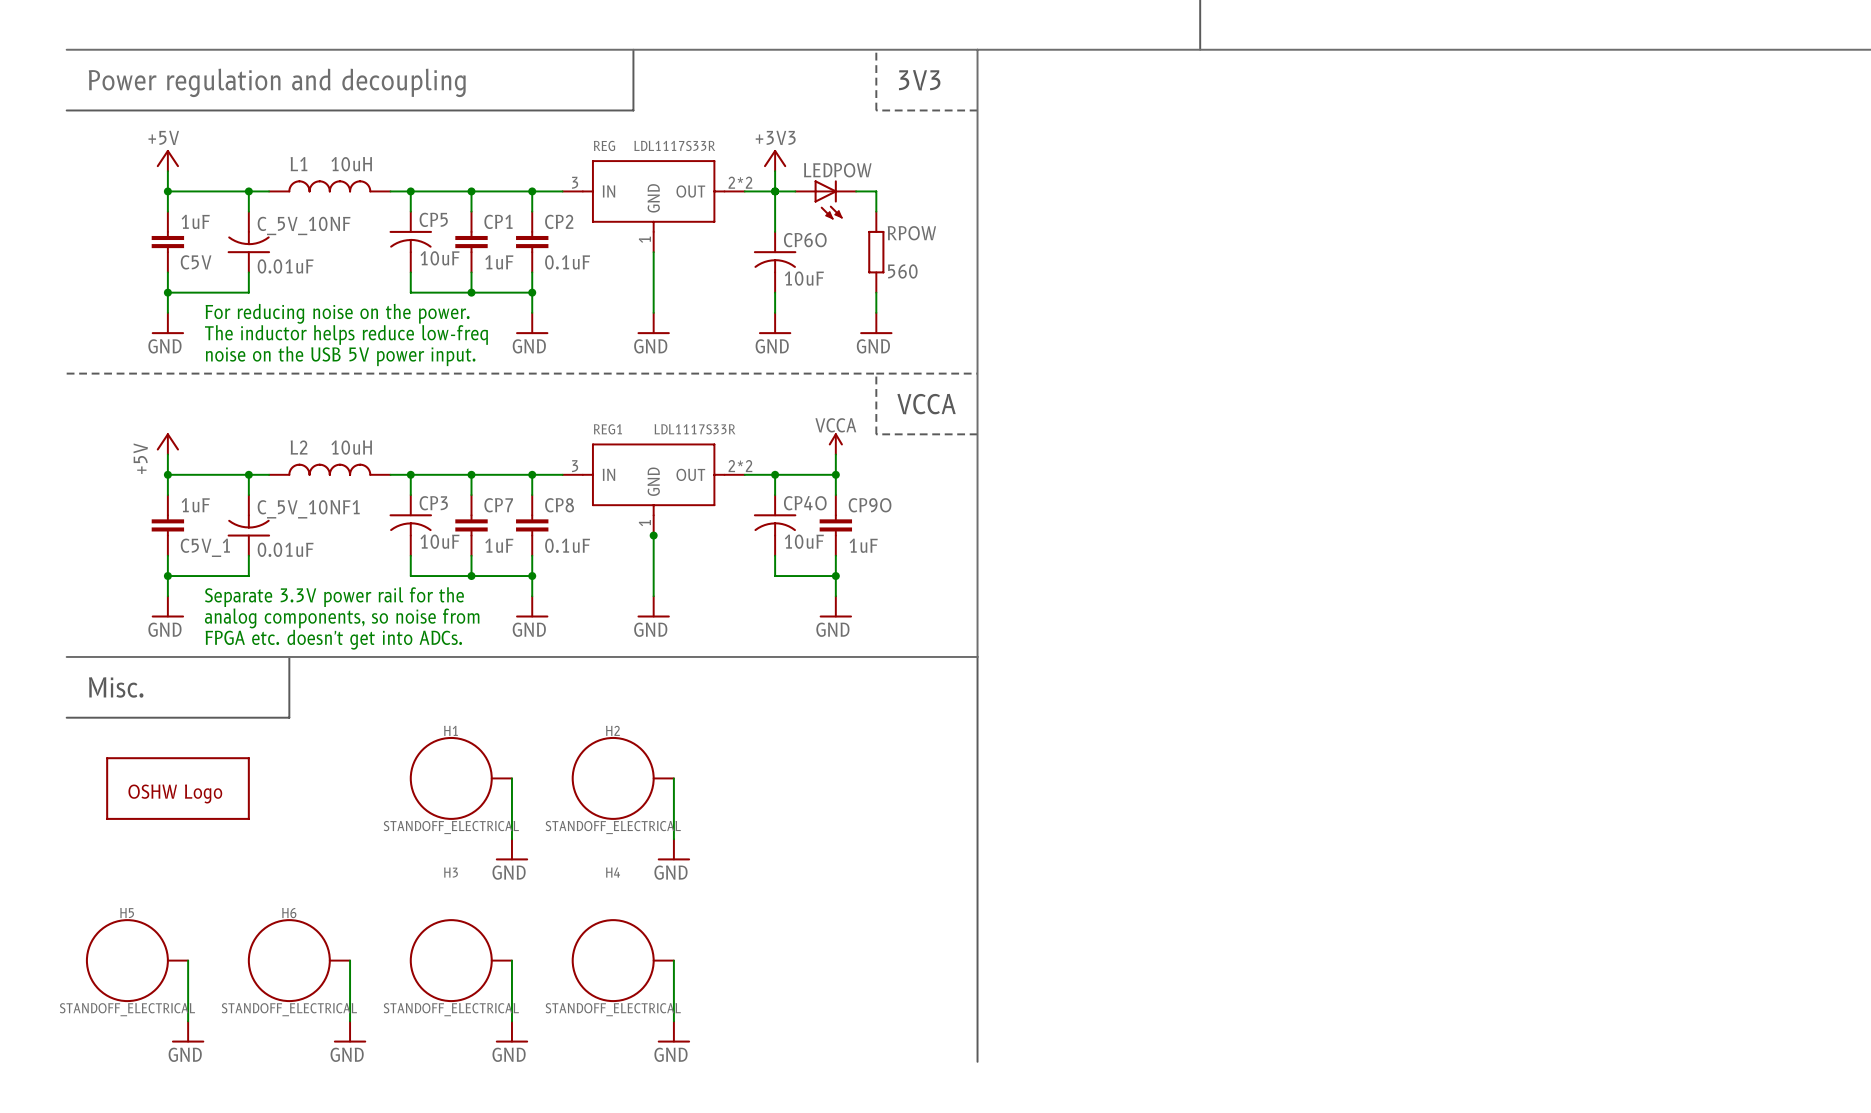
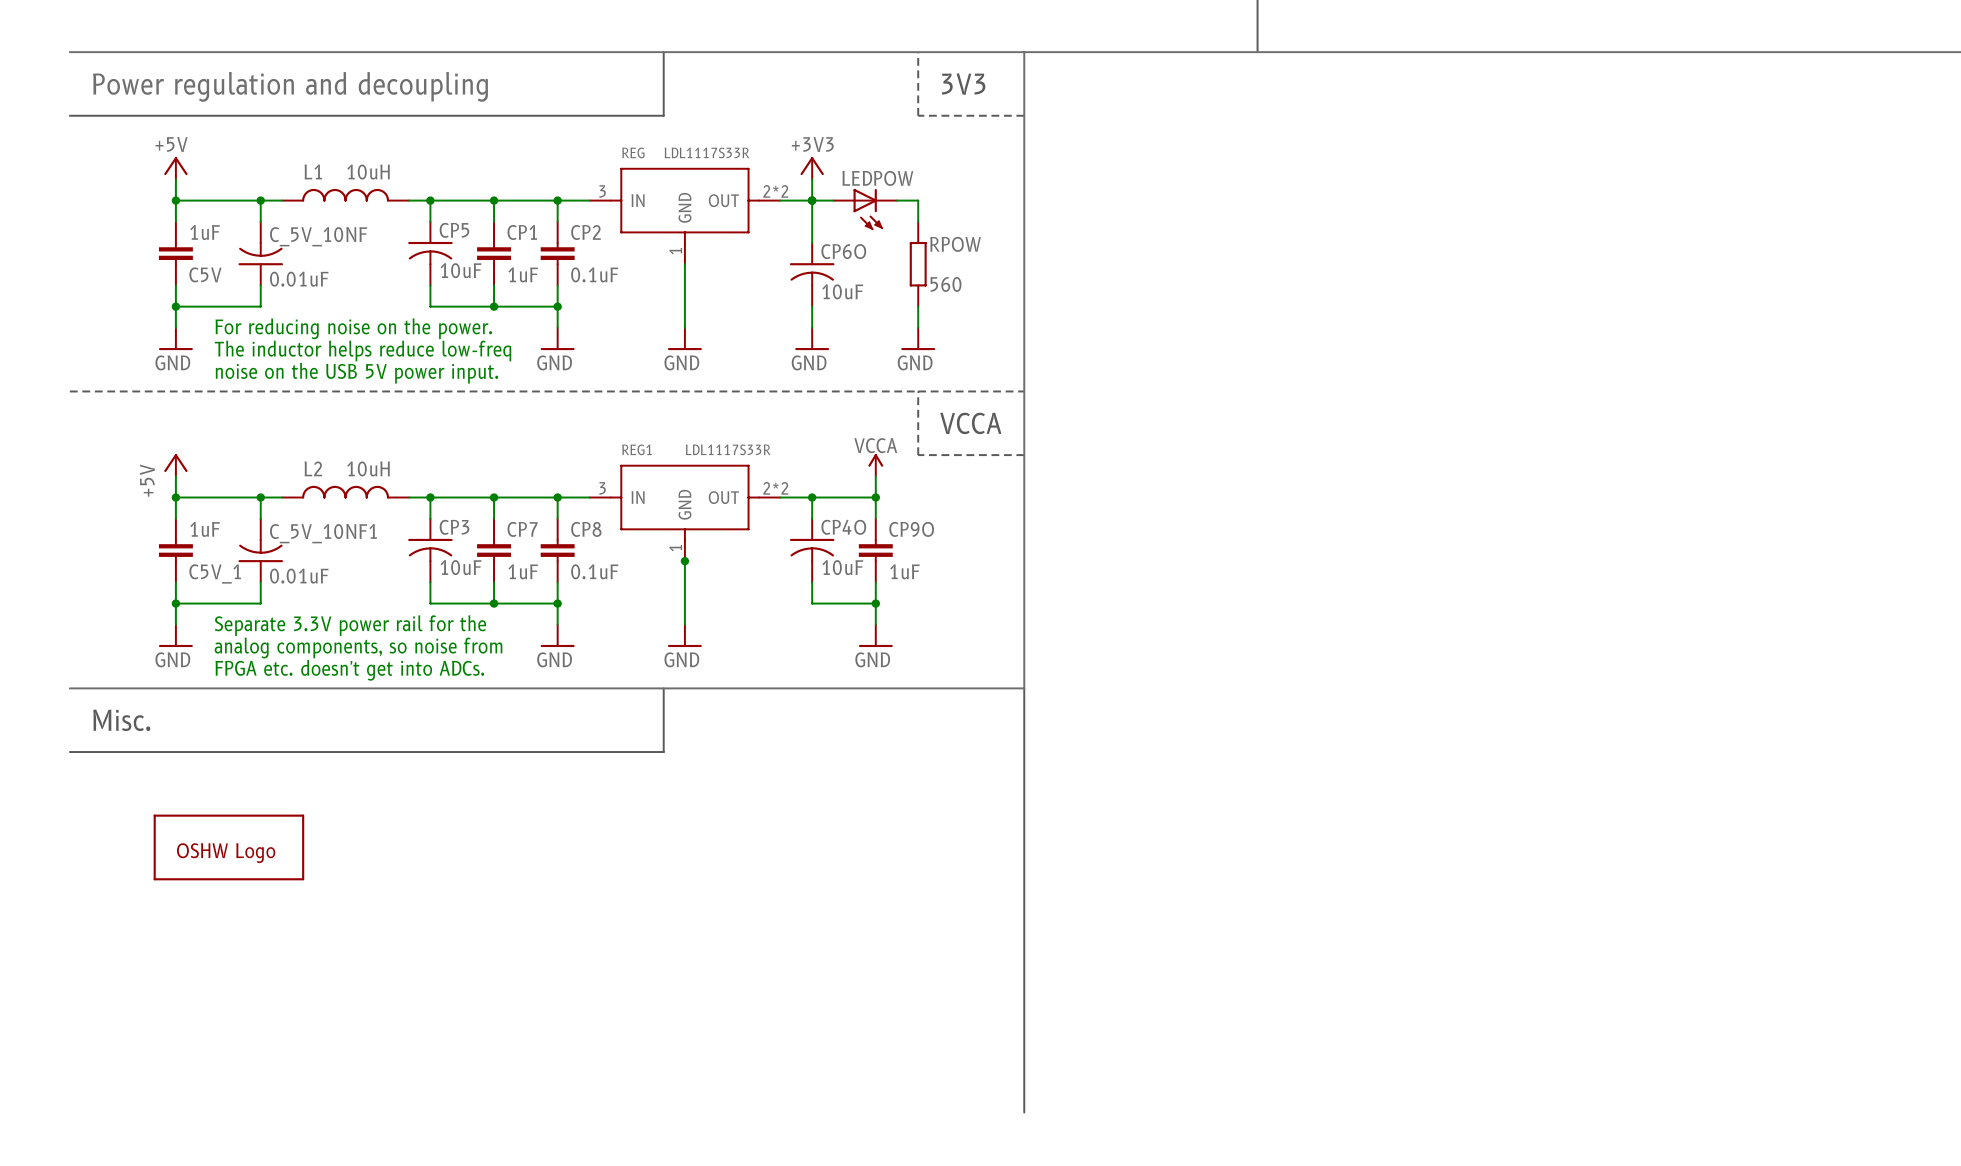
line: (289, 656) (289, 717) -> (663, 688) (663, 752) (303, 752)
H1: STANDOFF_ELECTRICAL (460, 778) -> none
wire: (511, 778) (511, 839) -> none
H2: STANDOFF_ELECTRICAL (622, 778) -> none
wire: (673, 778) (673, 839) -> none
part position: (178, 788) -> (228, 847)
power symbol: GND (511, 849) -> none
power symbol: GND (673, 849) -> none
H5: STANDOFF_ELECTRICAL (137, 960) -> none
wire: (188, 960) (188, 1021) -> none
H6: STANDOFF_ELECTRICAL (298, 960) -> none
wire: (350, 960) (350, 1021) -> none
H3: STANDOFF_ELECTRICAL (460, 960) -> none
wire: (511, 960) (511, 1021) -> none
H4: STANDOFF_ELECTRICAL (622, 960) -> none
wire: (673, 960) (673, 1021) -> none
power symbol: GND (188, 1031) -> none
power symbol: GND (350, 1031) -> none
power symbol: GND (511, 1031) -> none
power symbol: GND (673, 1031) -> none

